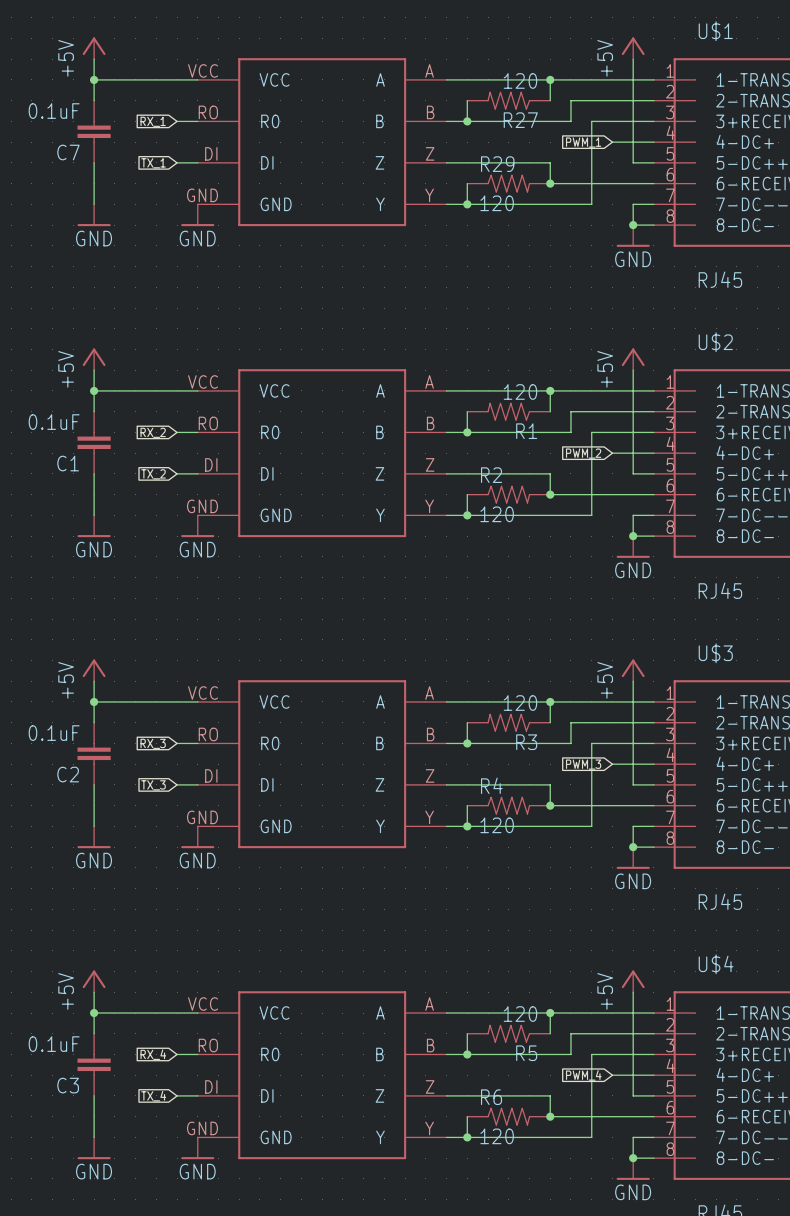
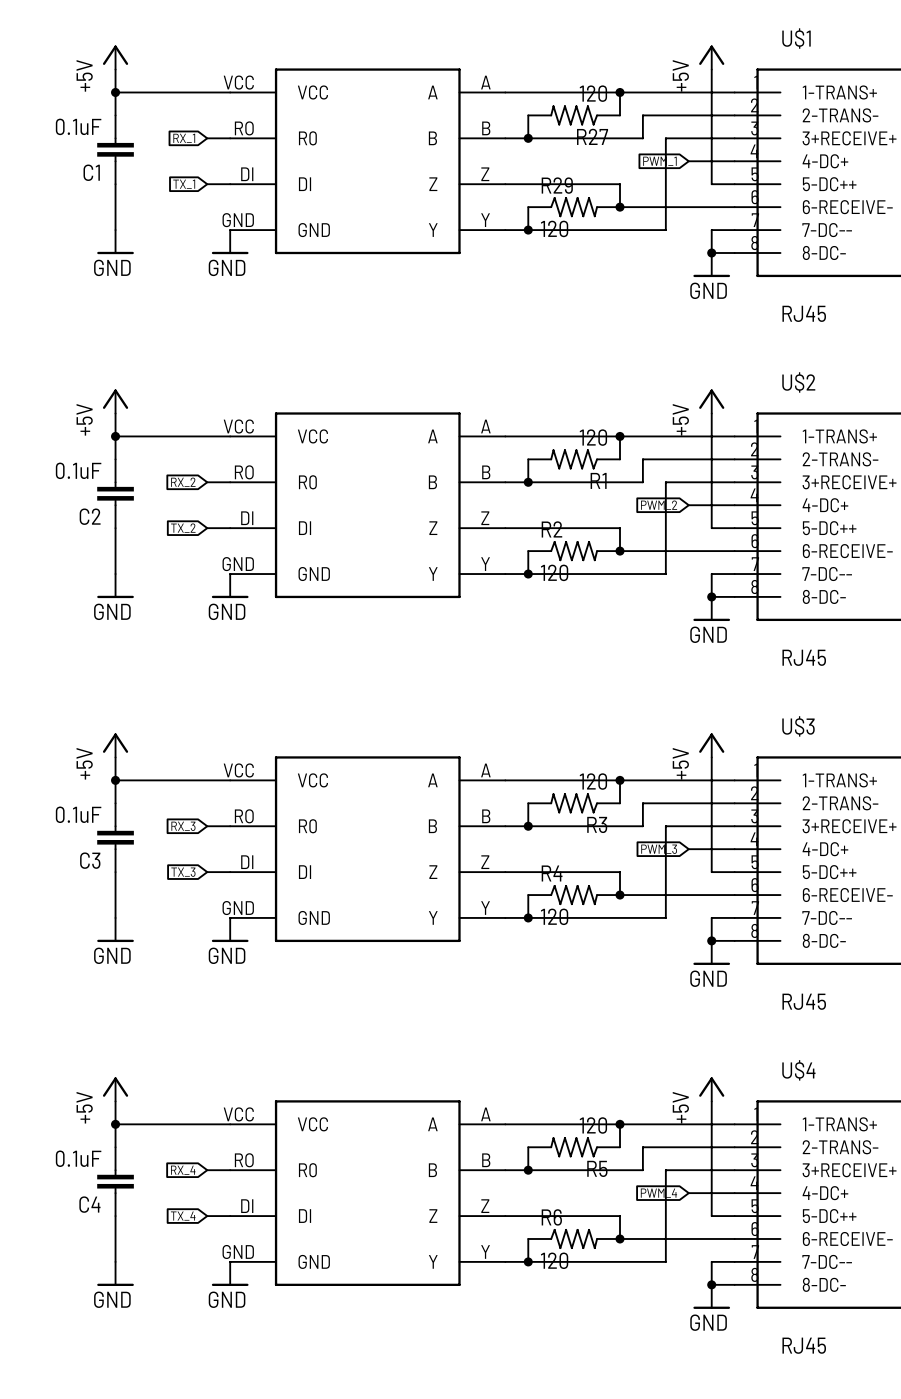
C7 name: C7 (68, 152) -> C1 (91, 172)
C1 name: C1 (68, 463) -> C2 (90, 516)
C2 name: C2 (68, 774) -> C3 (90, 860)
C3 name: C3 (68, 1085) -> C4 (89, 1204)

